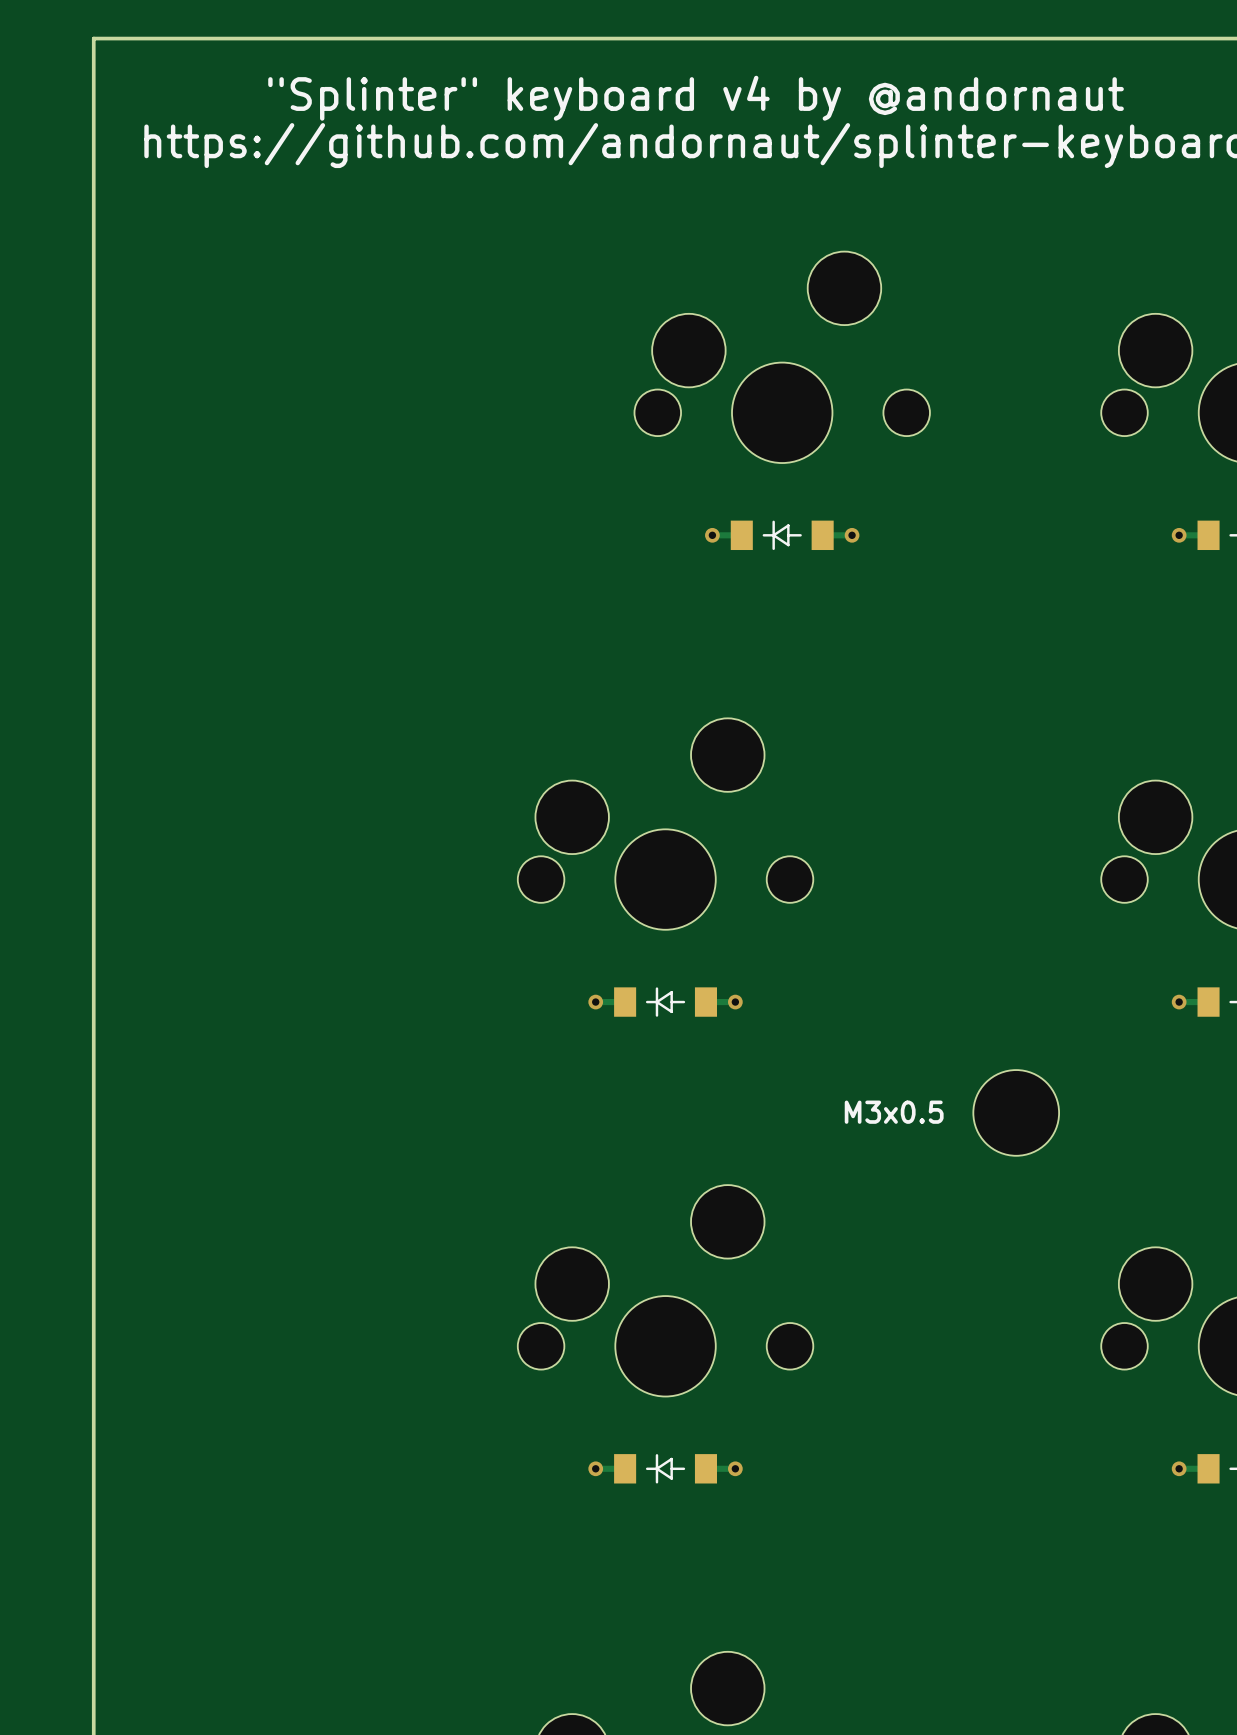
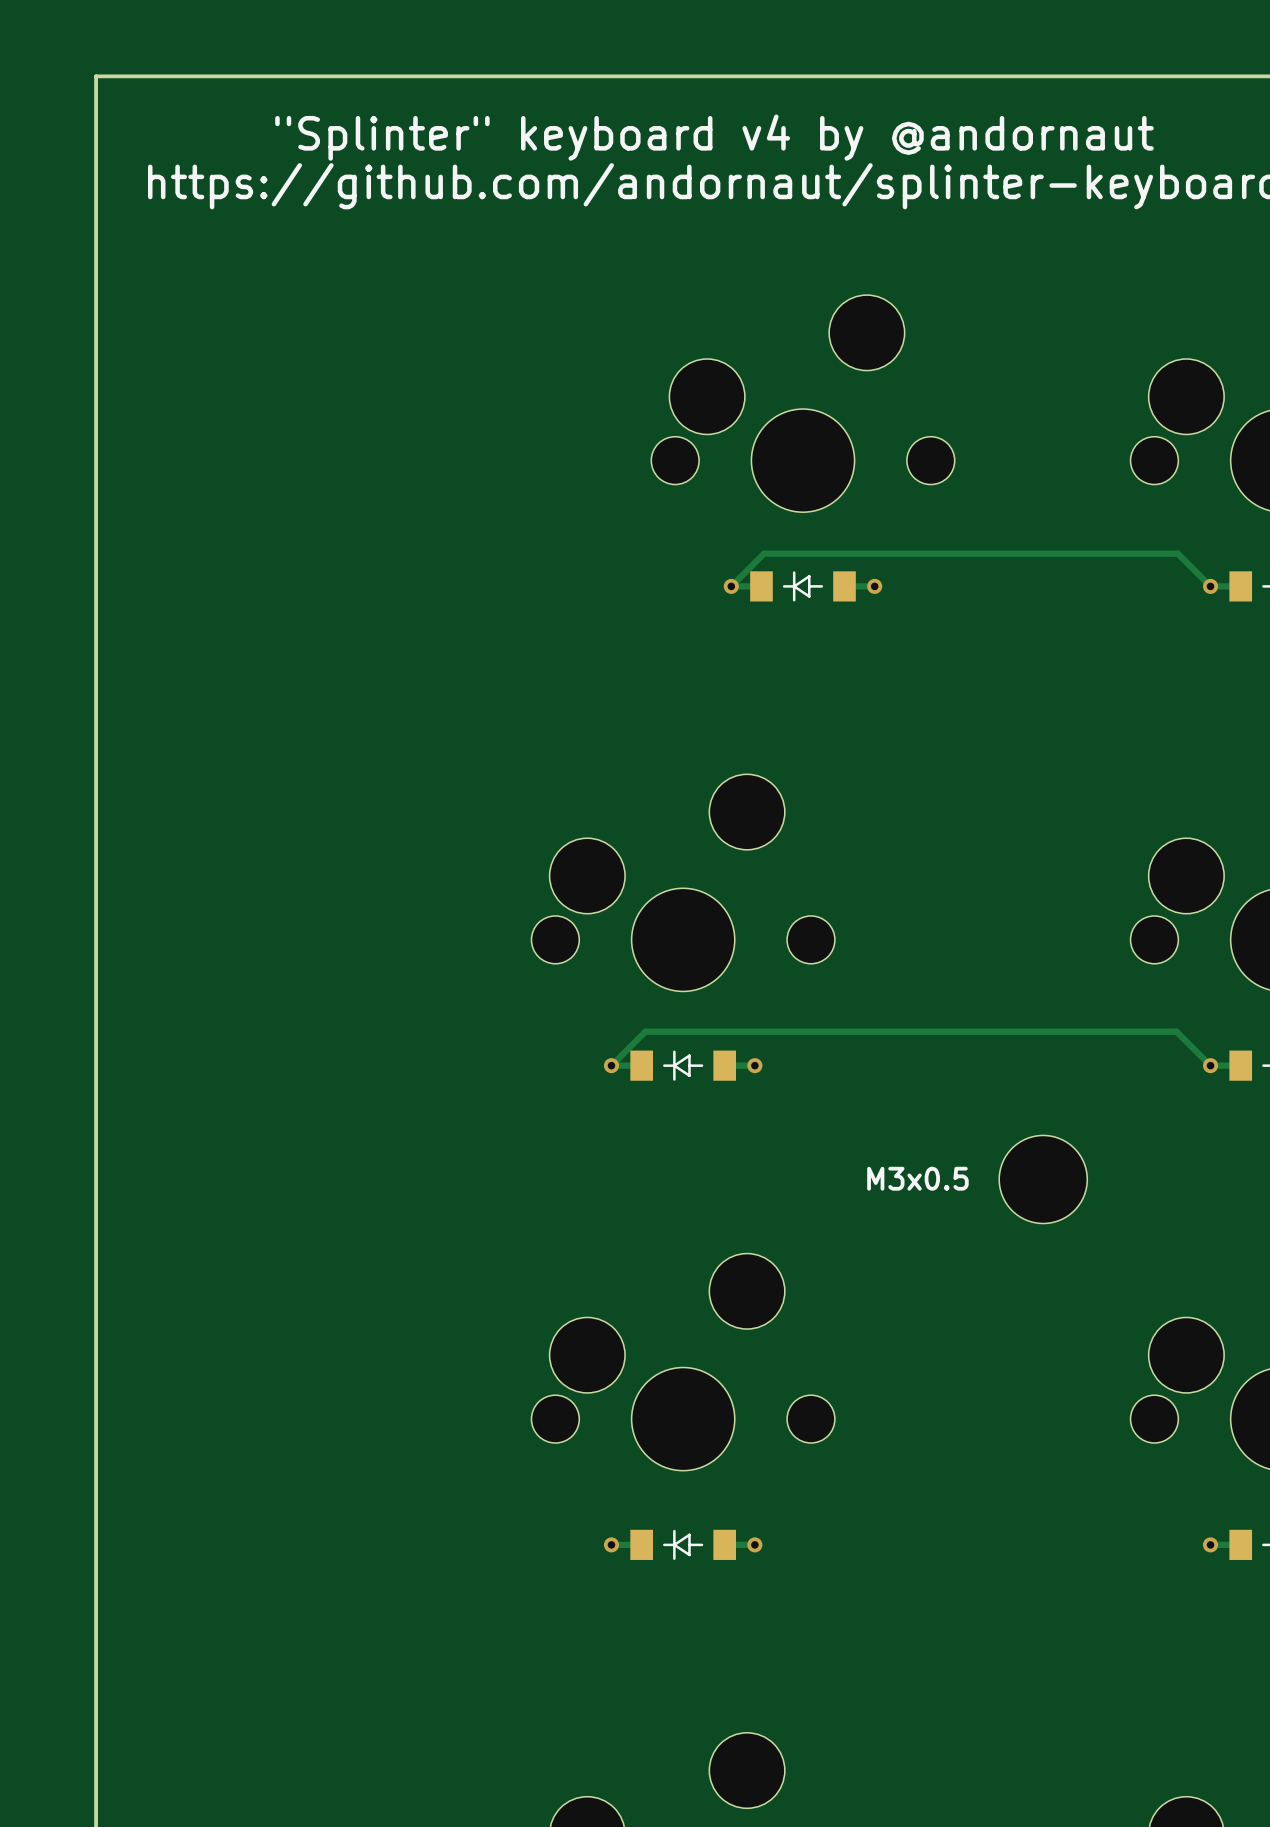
track: none -> (731, 586) (764, 553) (1177, 553) (1210, 586)
track: none -> (611, 1065) (645, 1031) (1176, 1031) (1210, 1065)

